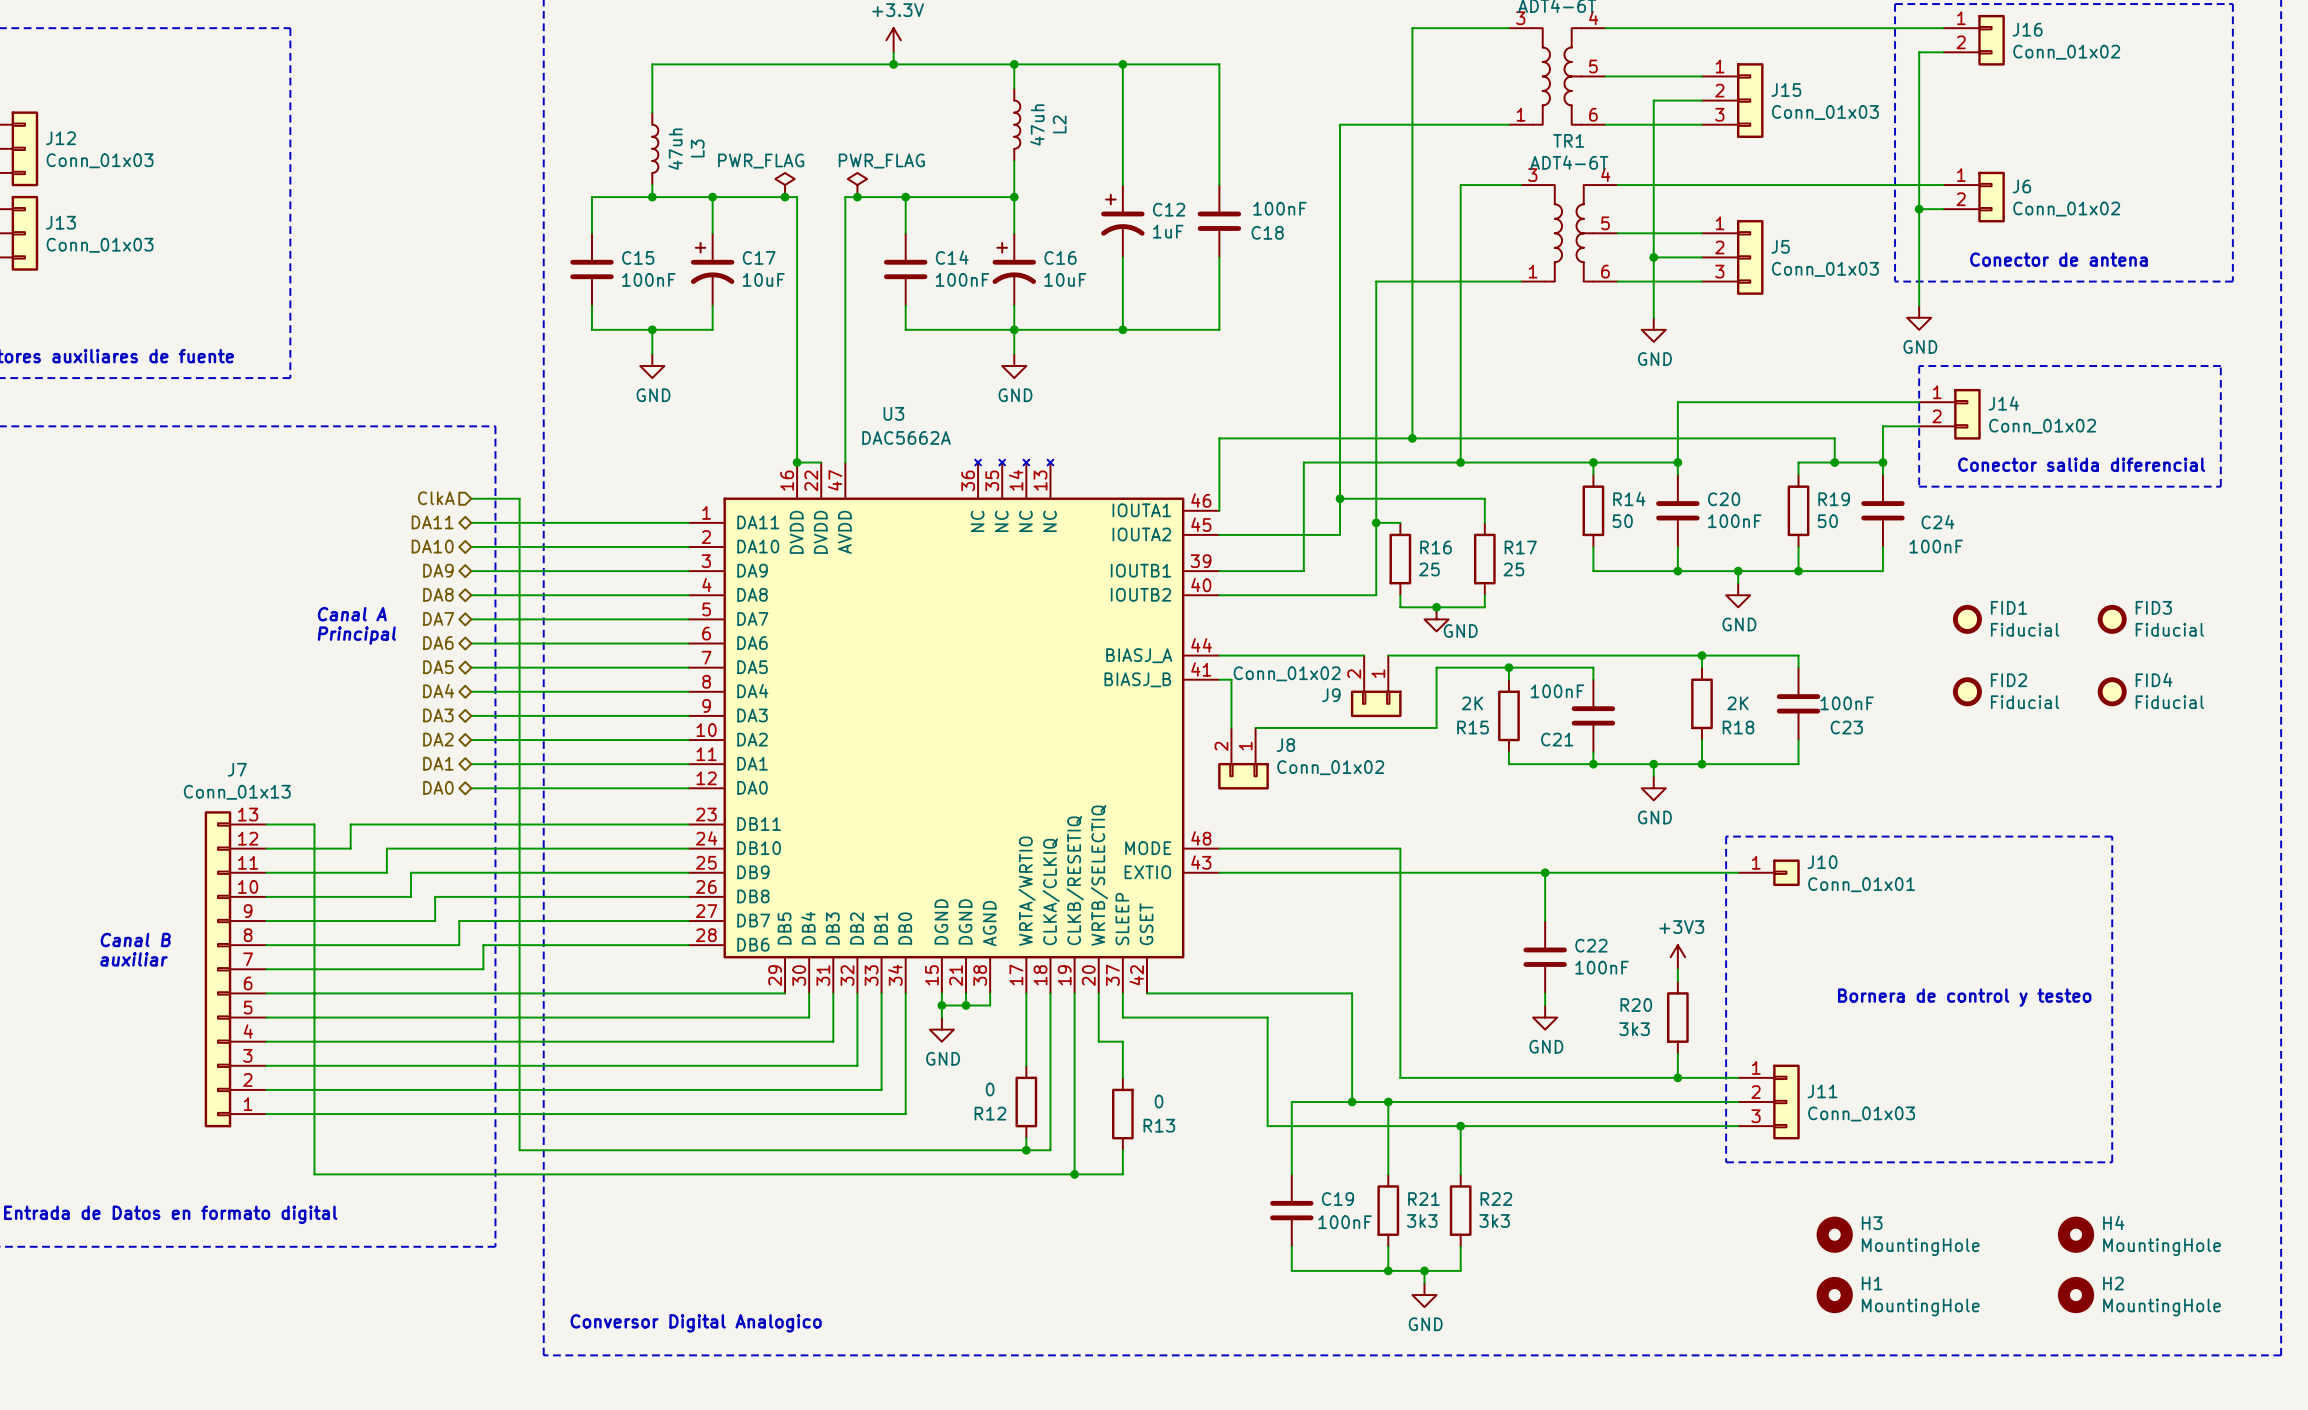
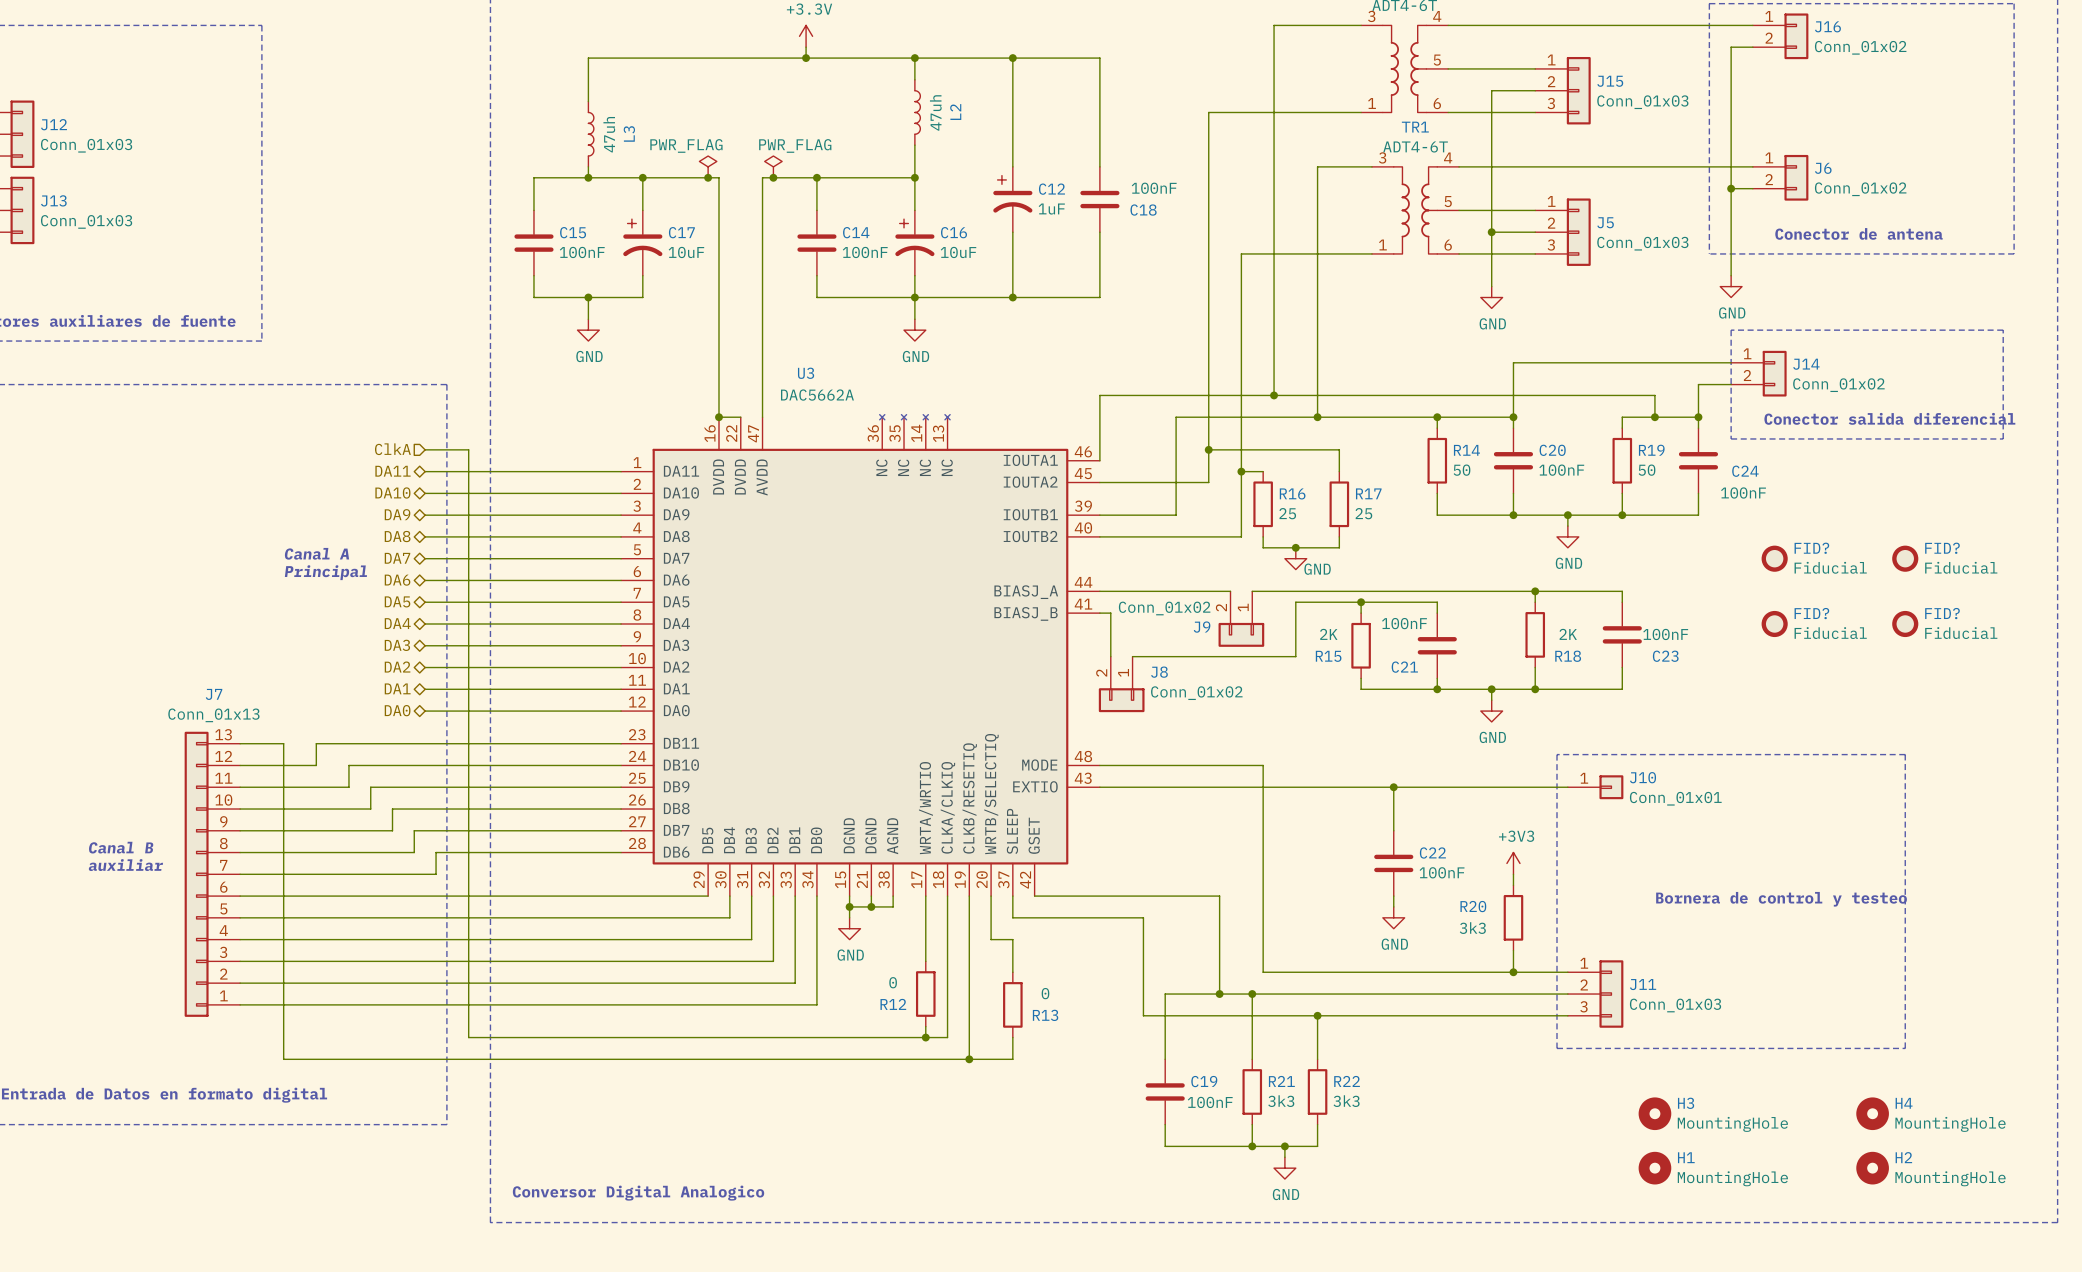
FID1 name: FID1 (2009, 607) -> FID? (1811, 548)
FID3 name: FID3 (2153, 607) -> FID? (1942, 548)
FID4 name: FID4 (2154, 679) -> FID? (1942, 613)
FID2 name: FID2 (2009, 680) -> FID? (1811, 613)

